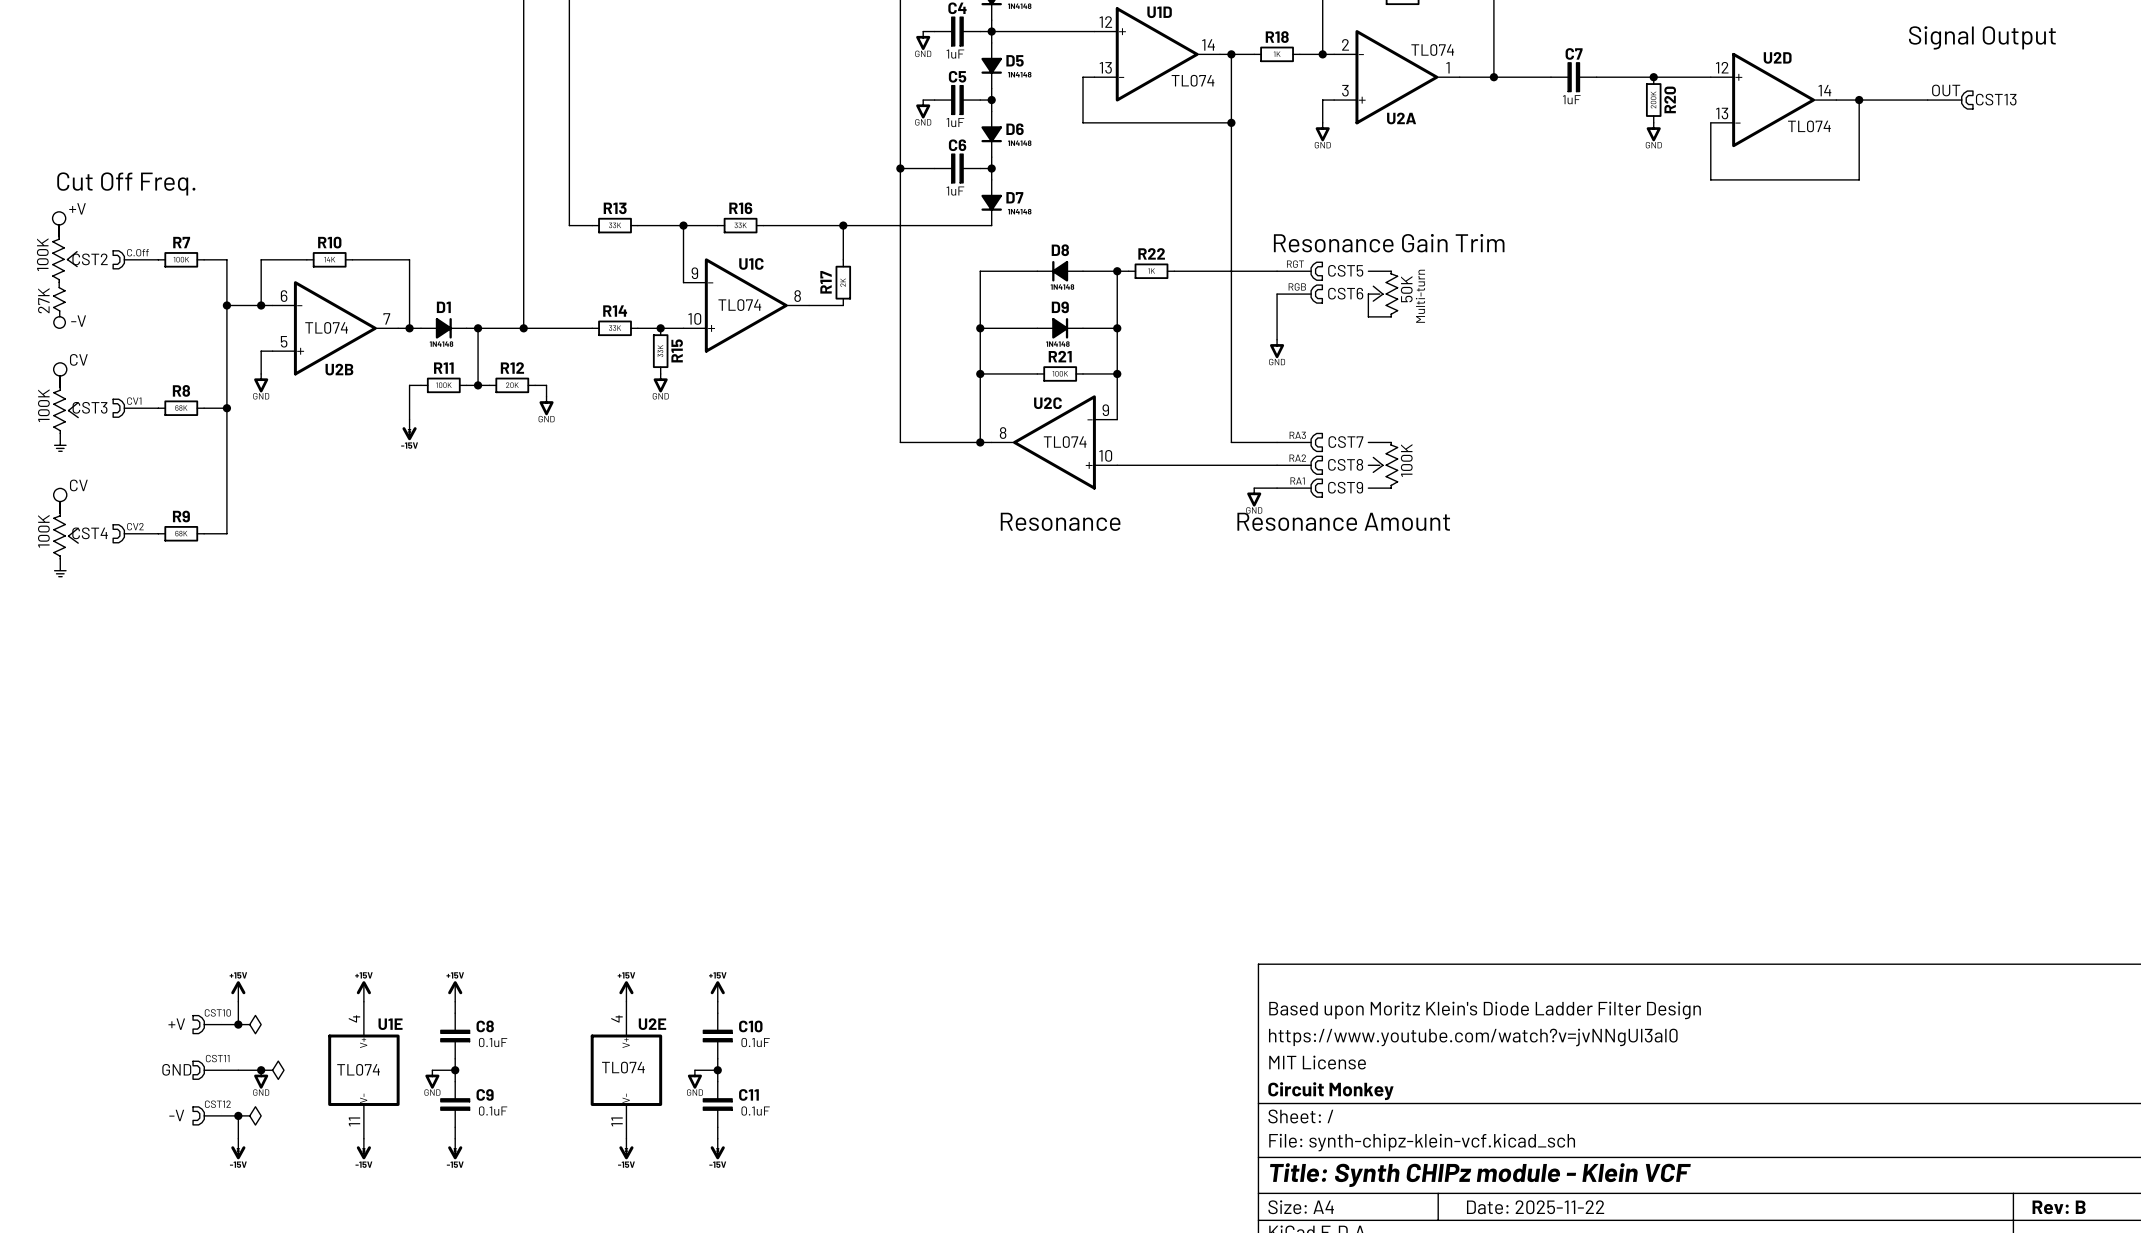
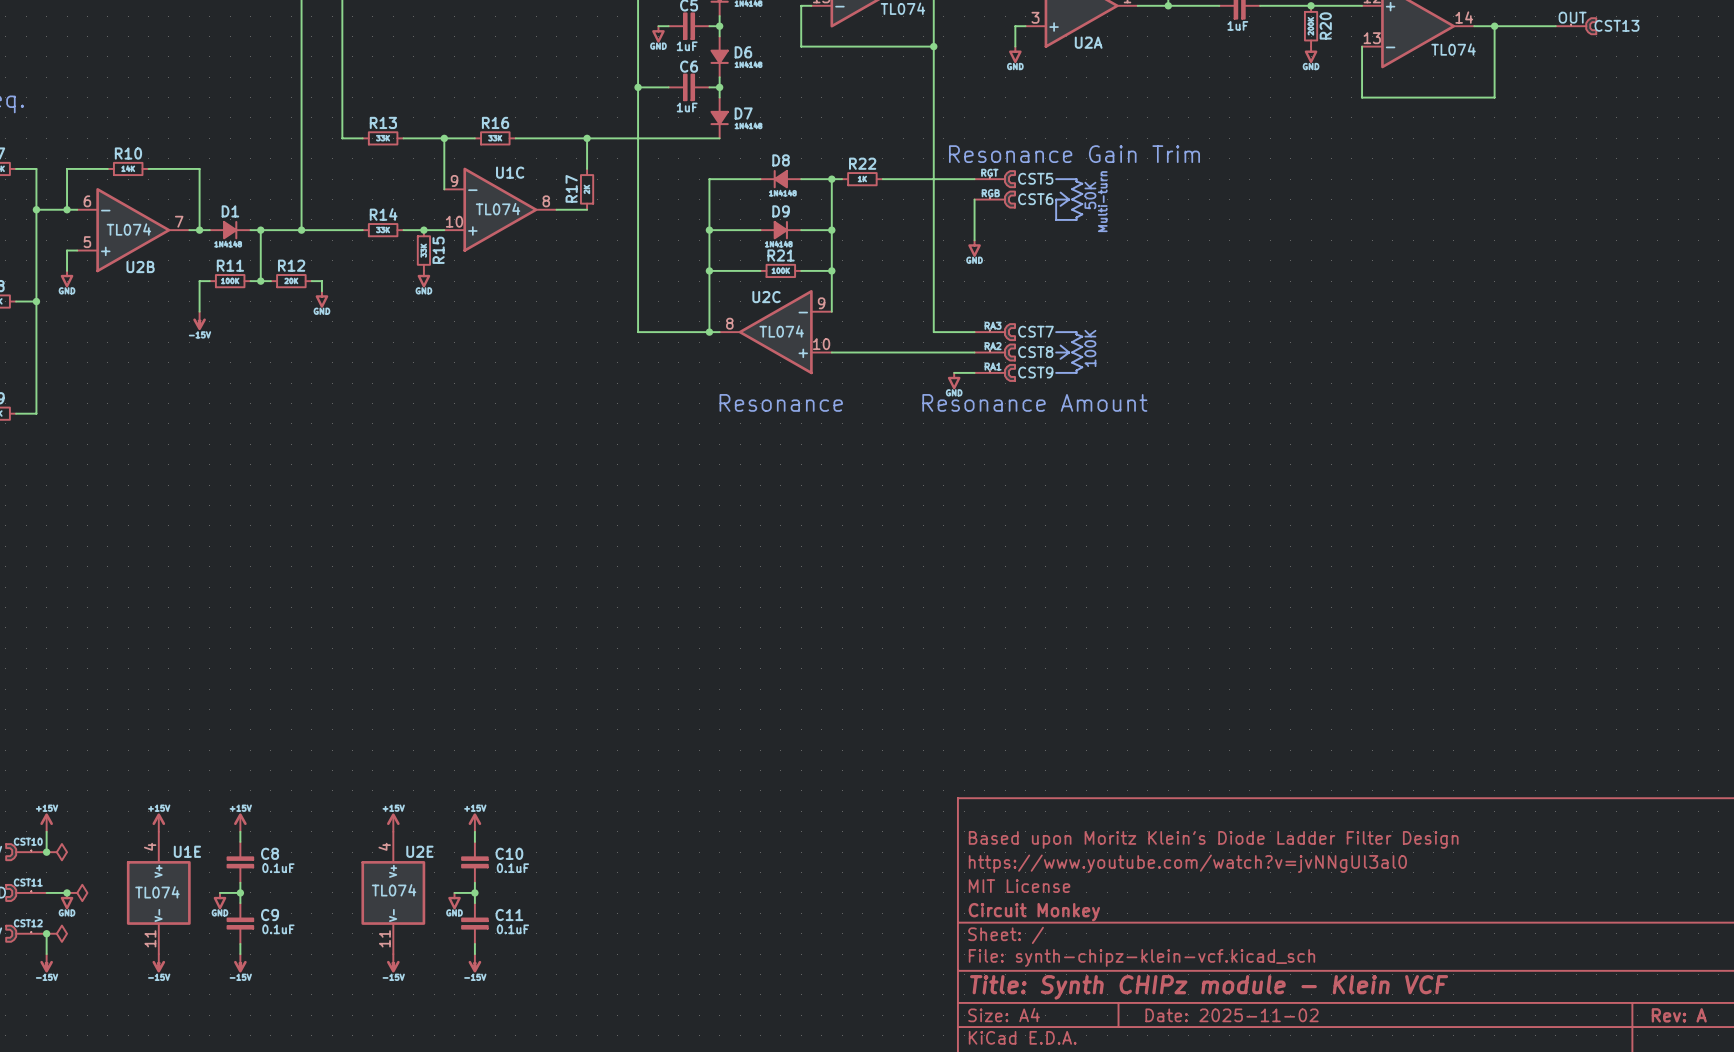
title block: Date: 2025-11-22 (1535, 1207) -> Date: 2025-11-02 (1232, 1015)
title block: Rev: B (2059, 1207) -> Rev: A (1679, 1015)

